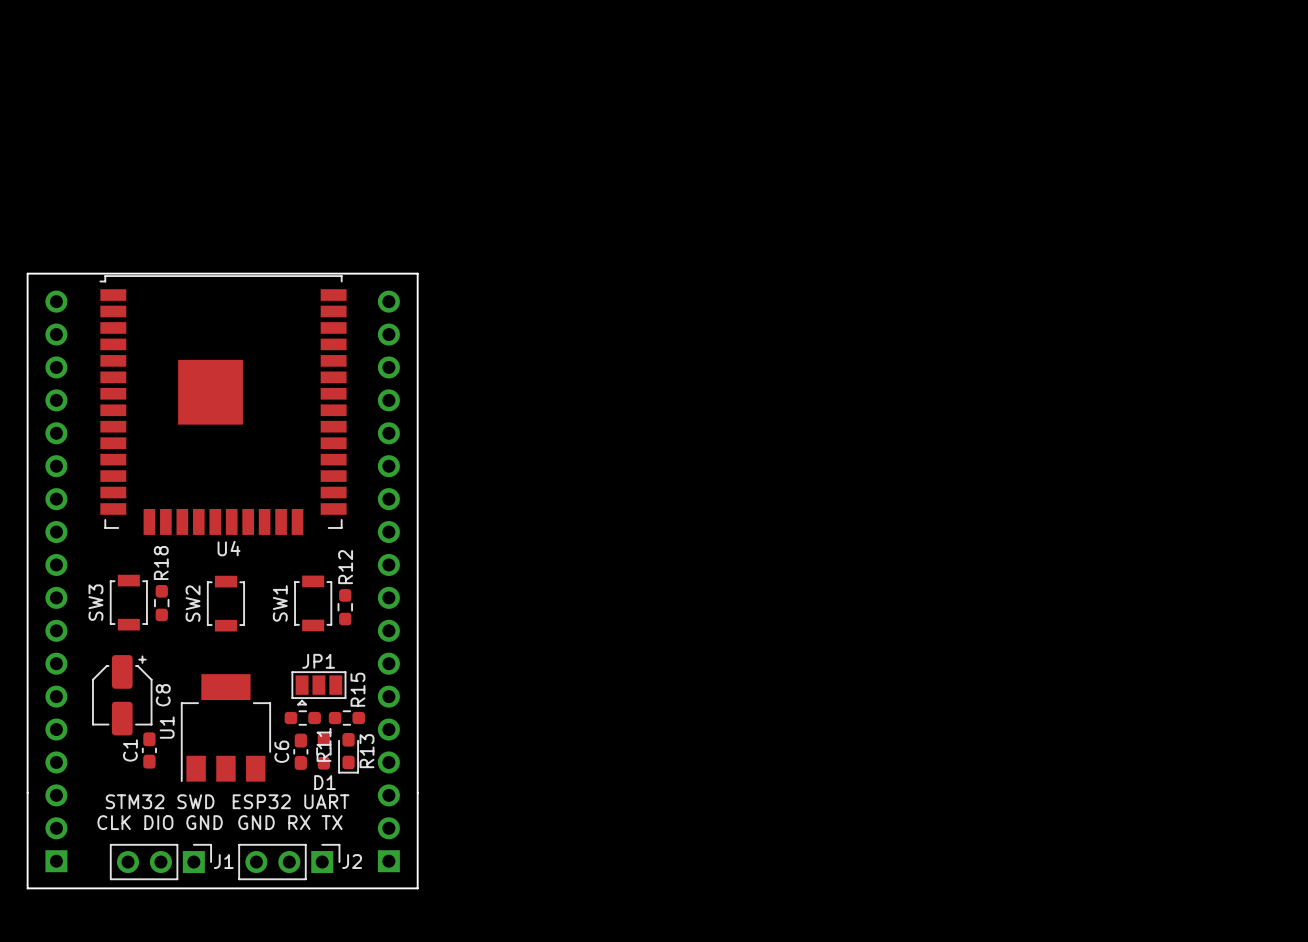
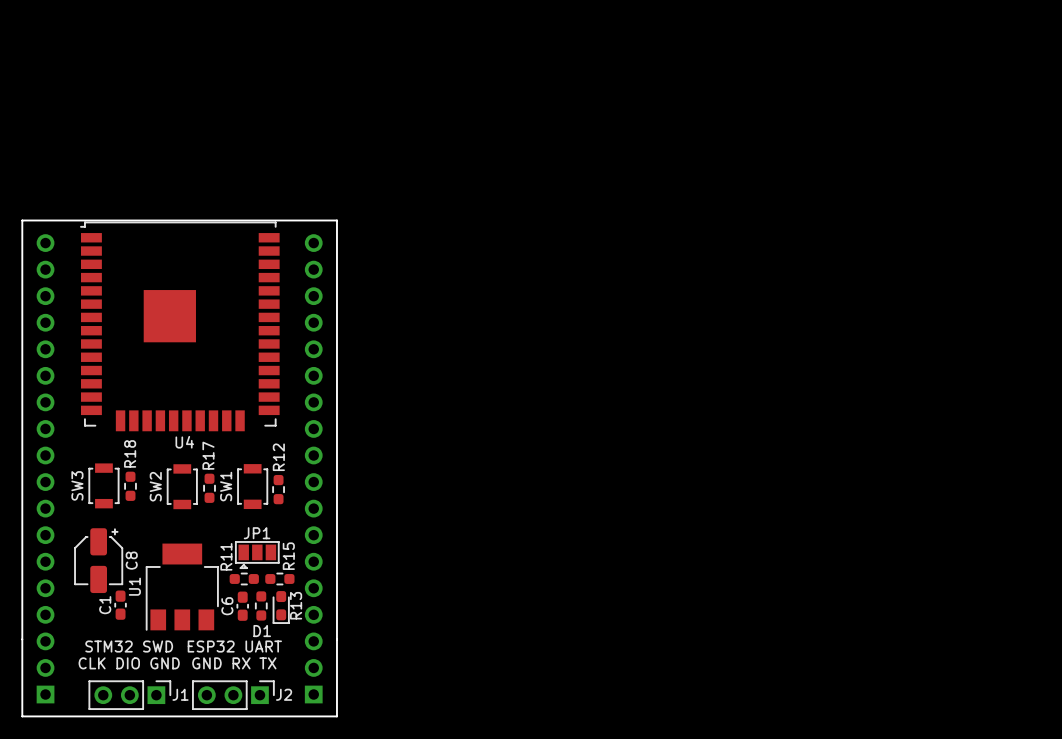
R17: none -> (209, 488)
R11 name position: R11 (324, 744) -> R11 (226, 556)

